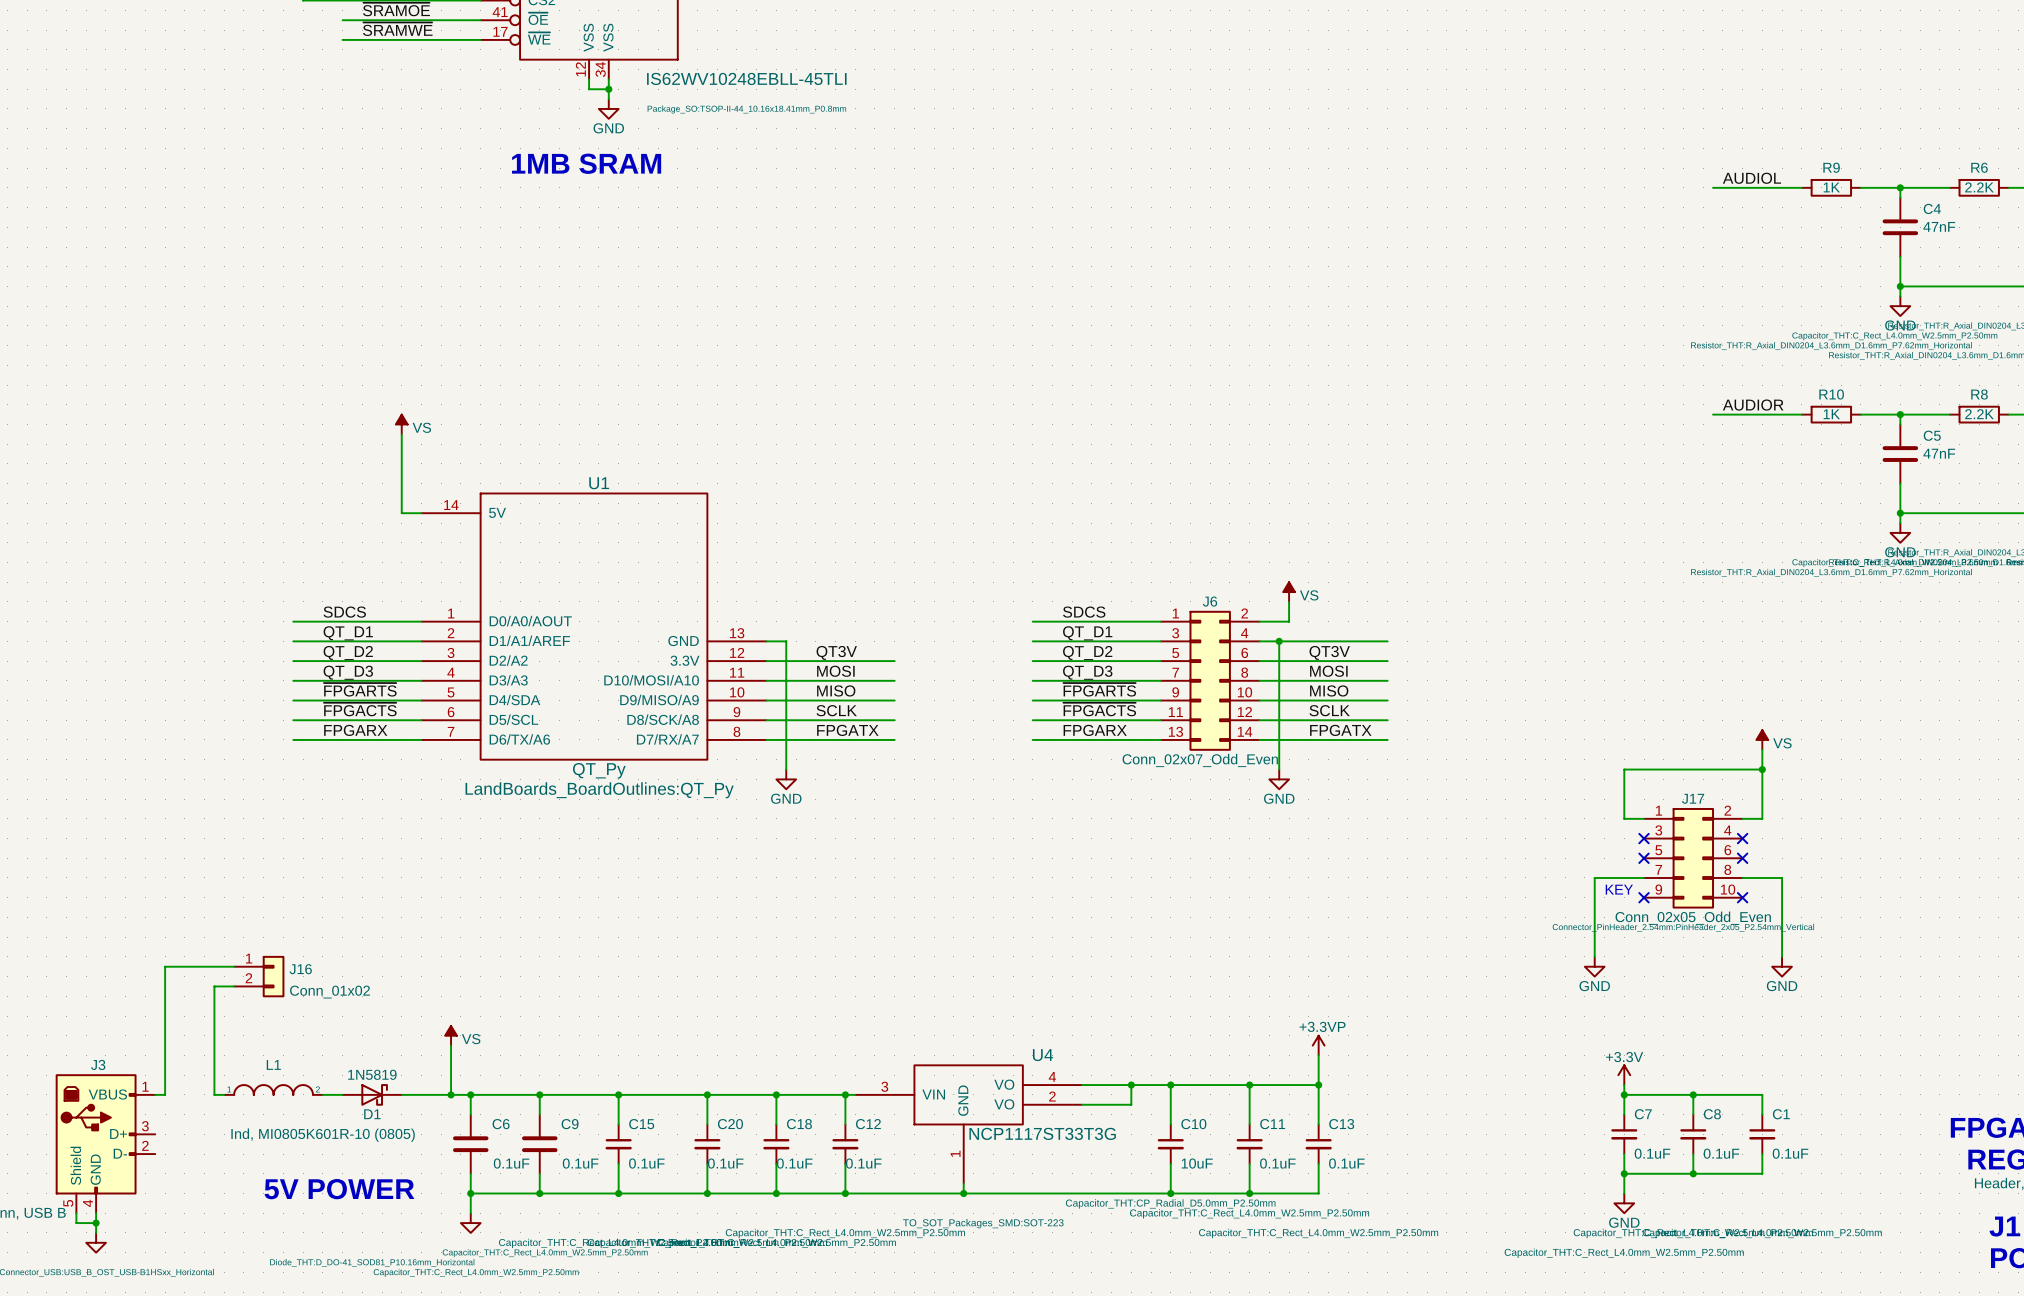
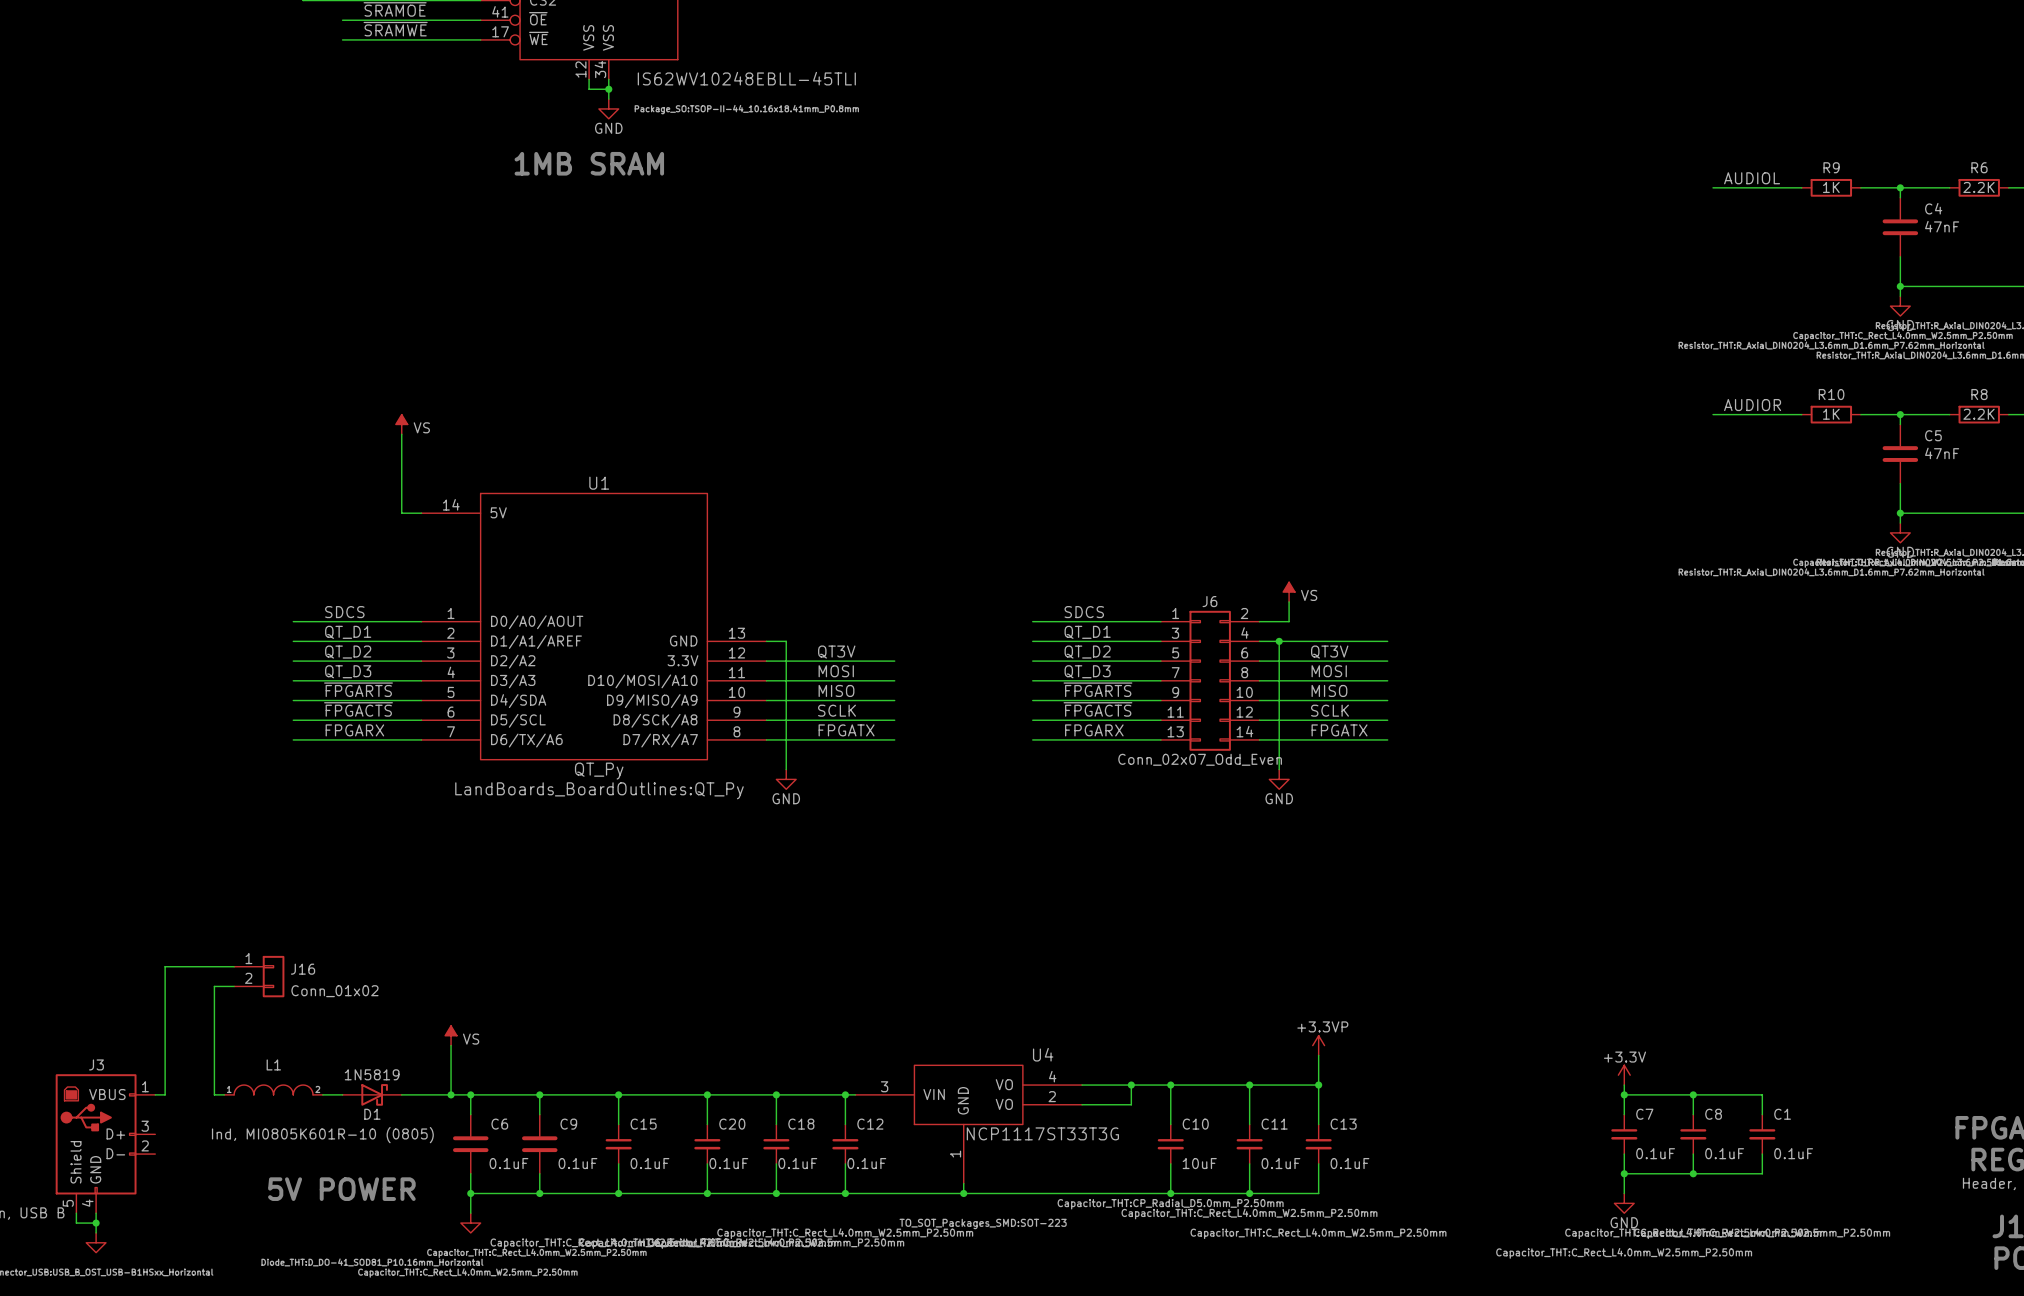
power symbol: VS (1762, 739) -> none
wire: (1762, 749) (1762, 818) (1742, 818) -> none
wire: (1762, 769) (1624, 769) (1624, 818) (1644, 818) -> none
junction: (1762, 769) -> none
no-connect mark: (1644, 838) -> none
no-connect mark: (1742, 838) -> none
no-connect mark: (1644, 858) -> none
J17: Conn_02x05_Odd_Even (1693, 858) -> none
no-connect mark: (1742, 858) -> none
wire: (1644, 877) (1594, 877) (1594, 956) -> none
wire: (1742, 877) (1782, 877) (1782, 956) -> none
text: KEY (1619, 889) -> none
no-connect mark: (1644, 897) -> none
no-connect mark: (1742, 897) -> none
power symbol: GND (1594, 966) -> none
power symbol: GND (1782, 966) -> none

